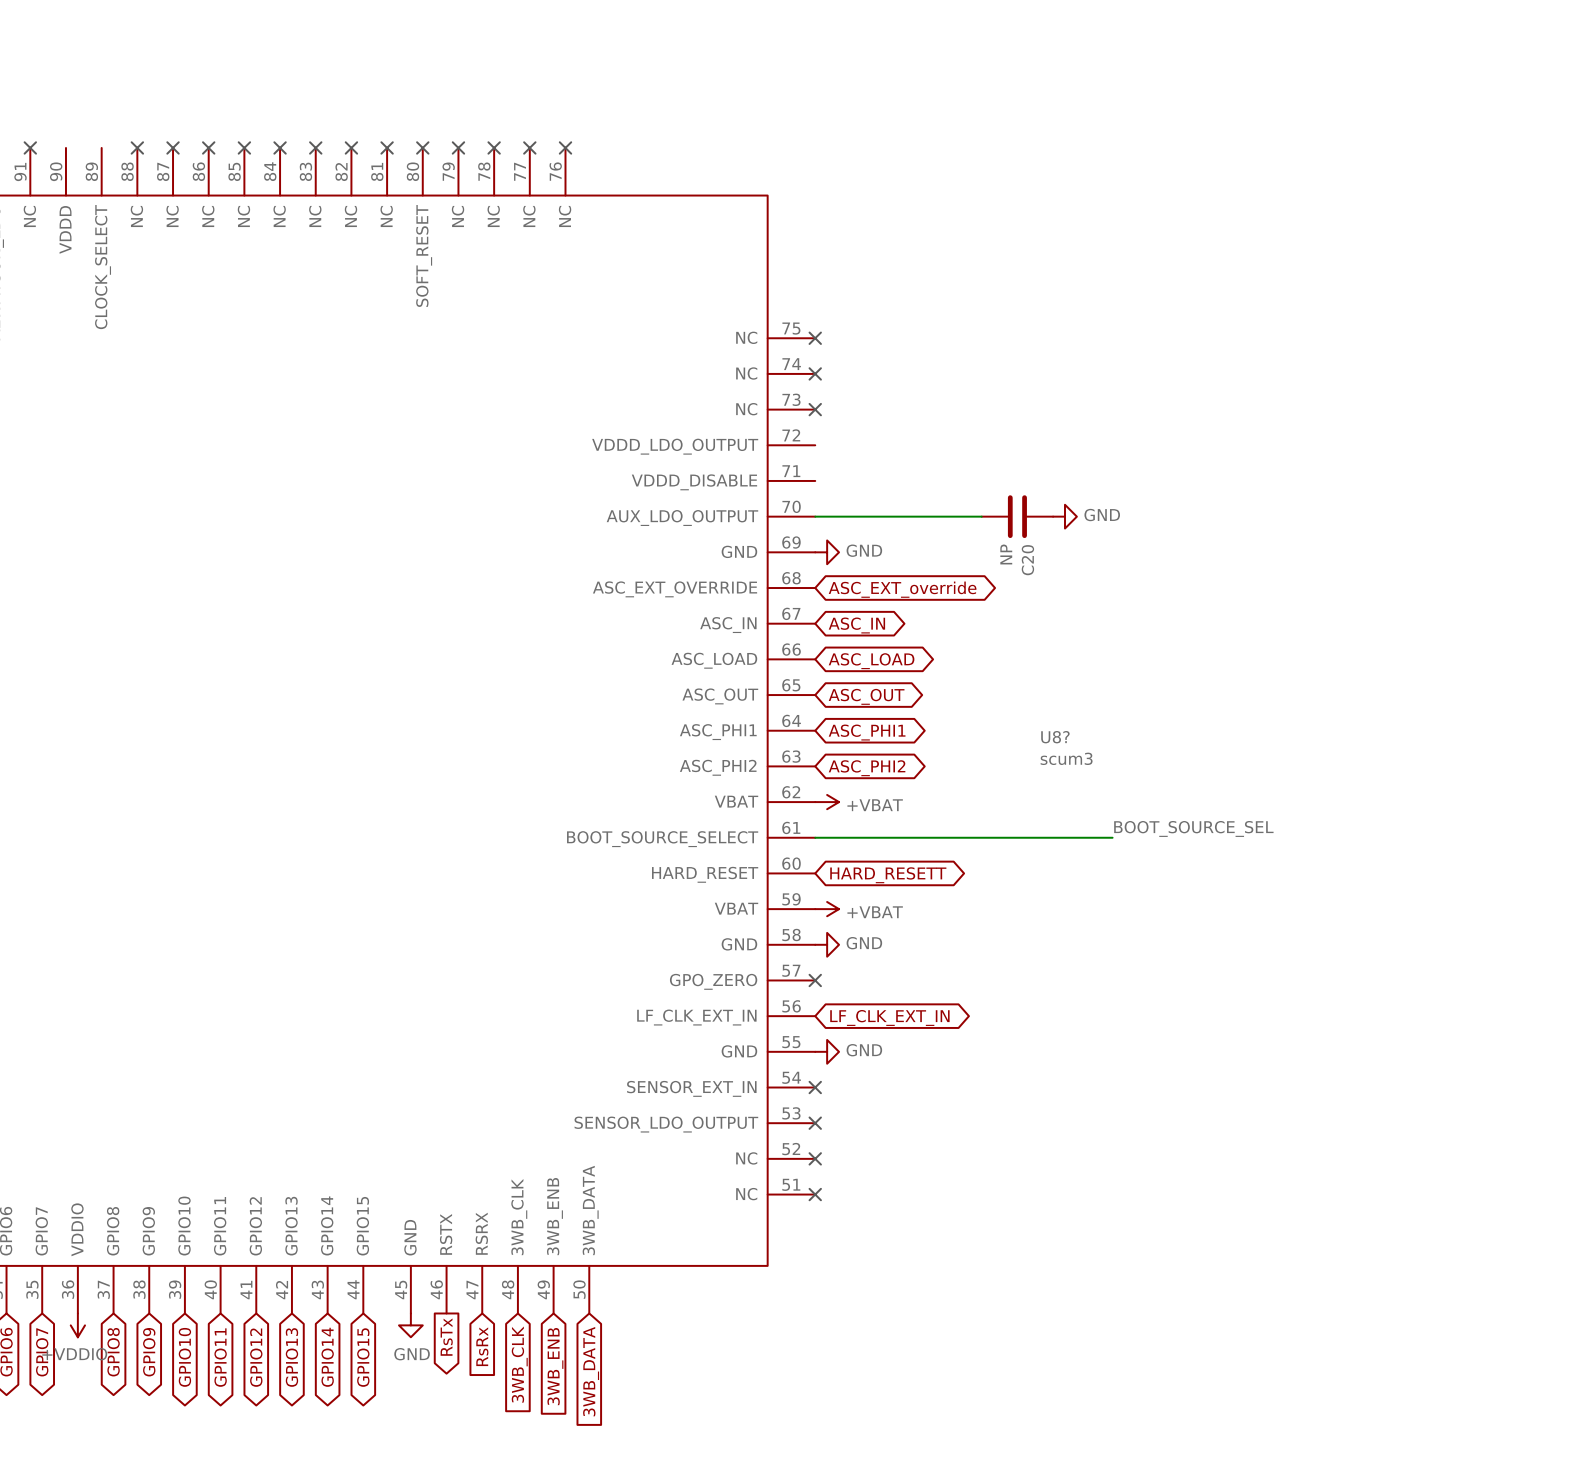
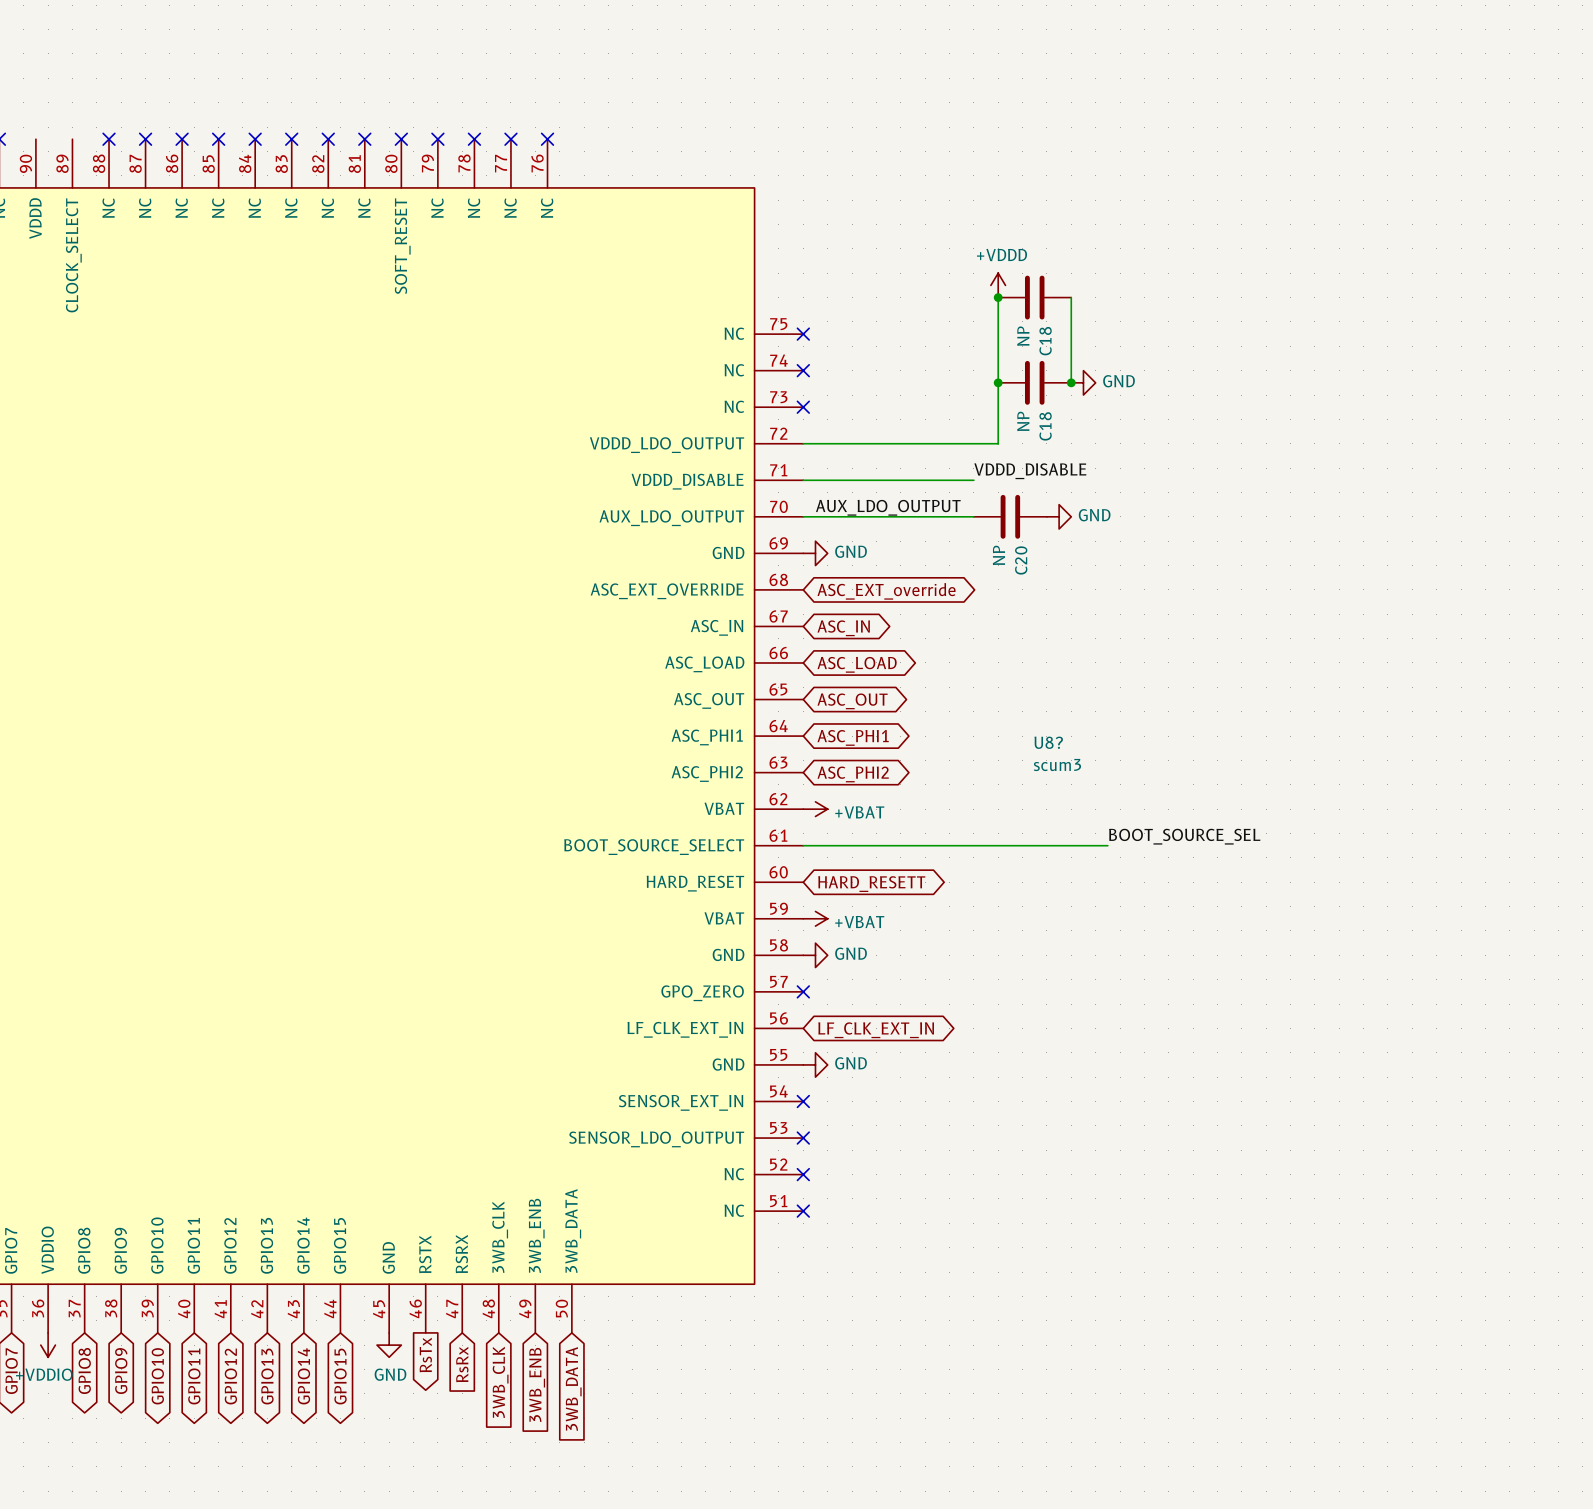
power symbol: none -> +VDDD (998, 285)
wire: none -> (998, 297) (998, 443) (803, 443)
junction: none -> (998, 297)
C18: none -> NP (1034, 297)
wire: none -> (1071, 297) (1071, 382)
junction: none -> (998, 382)
C18: none -> NP (1034, 382)
junction: none -> (1071, 382)
power symbol: none -> GND (1083, 382)
label: none -> VDDD_DISABLE (1030, 471)
wire: none -> (803, 480) (973, 480)
label: none -> AUX_LDO_OUTPUT (888, 507)

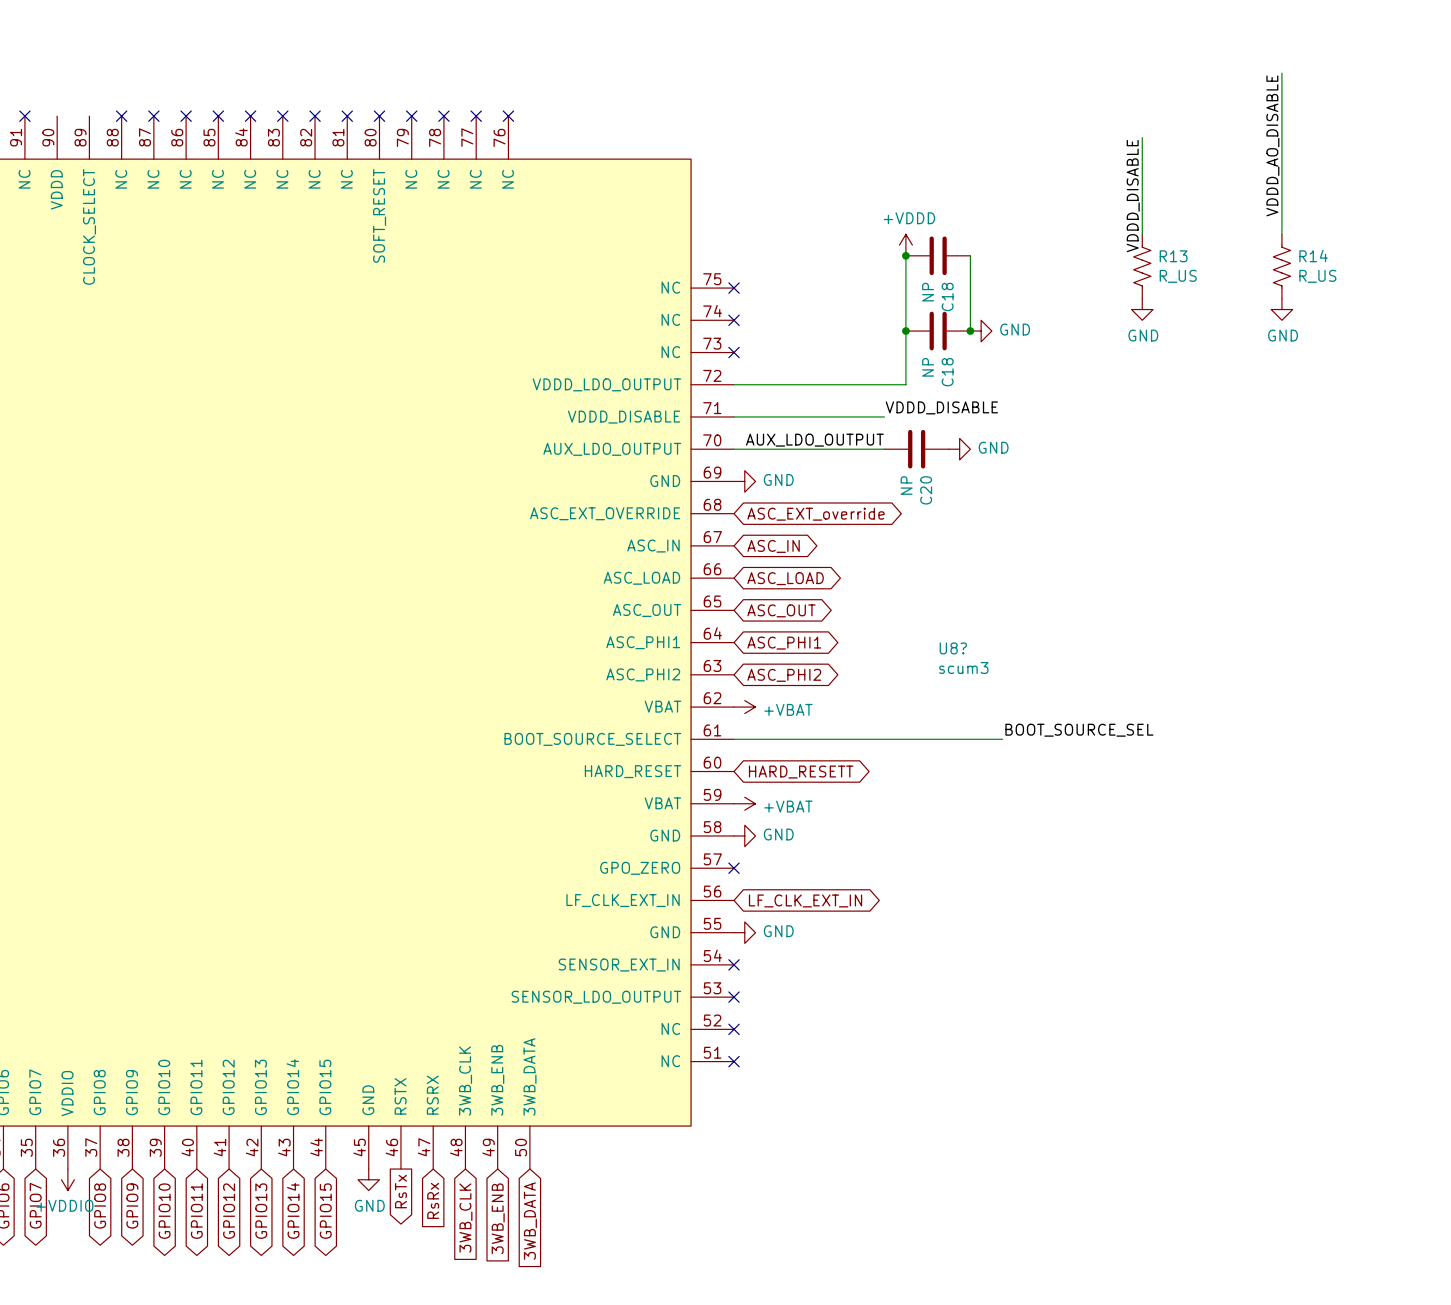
wire: none -> (1281, 73) (1281, 234)
wire: none -> (1142, 137) (1142, 234)
label: none -> VDDD_AO_DISABLE (1272, 145)
label: none -> VDDD_DISABLE (1133, 196)
R13: none -> R_US (1142, 266)
R14: none -> R_US (1281, 266)
power symbol: none -> GND (1142, 309)
power symbol: none -> GND (1281, 309)

